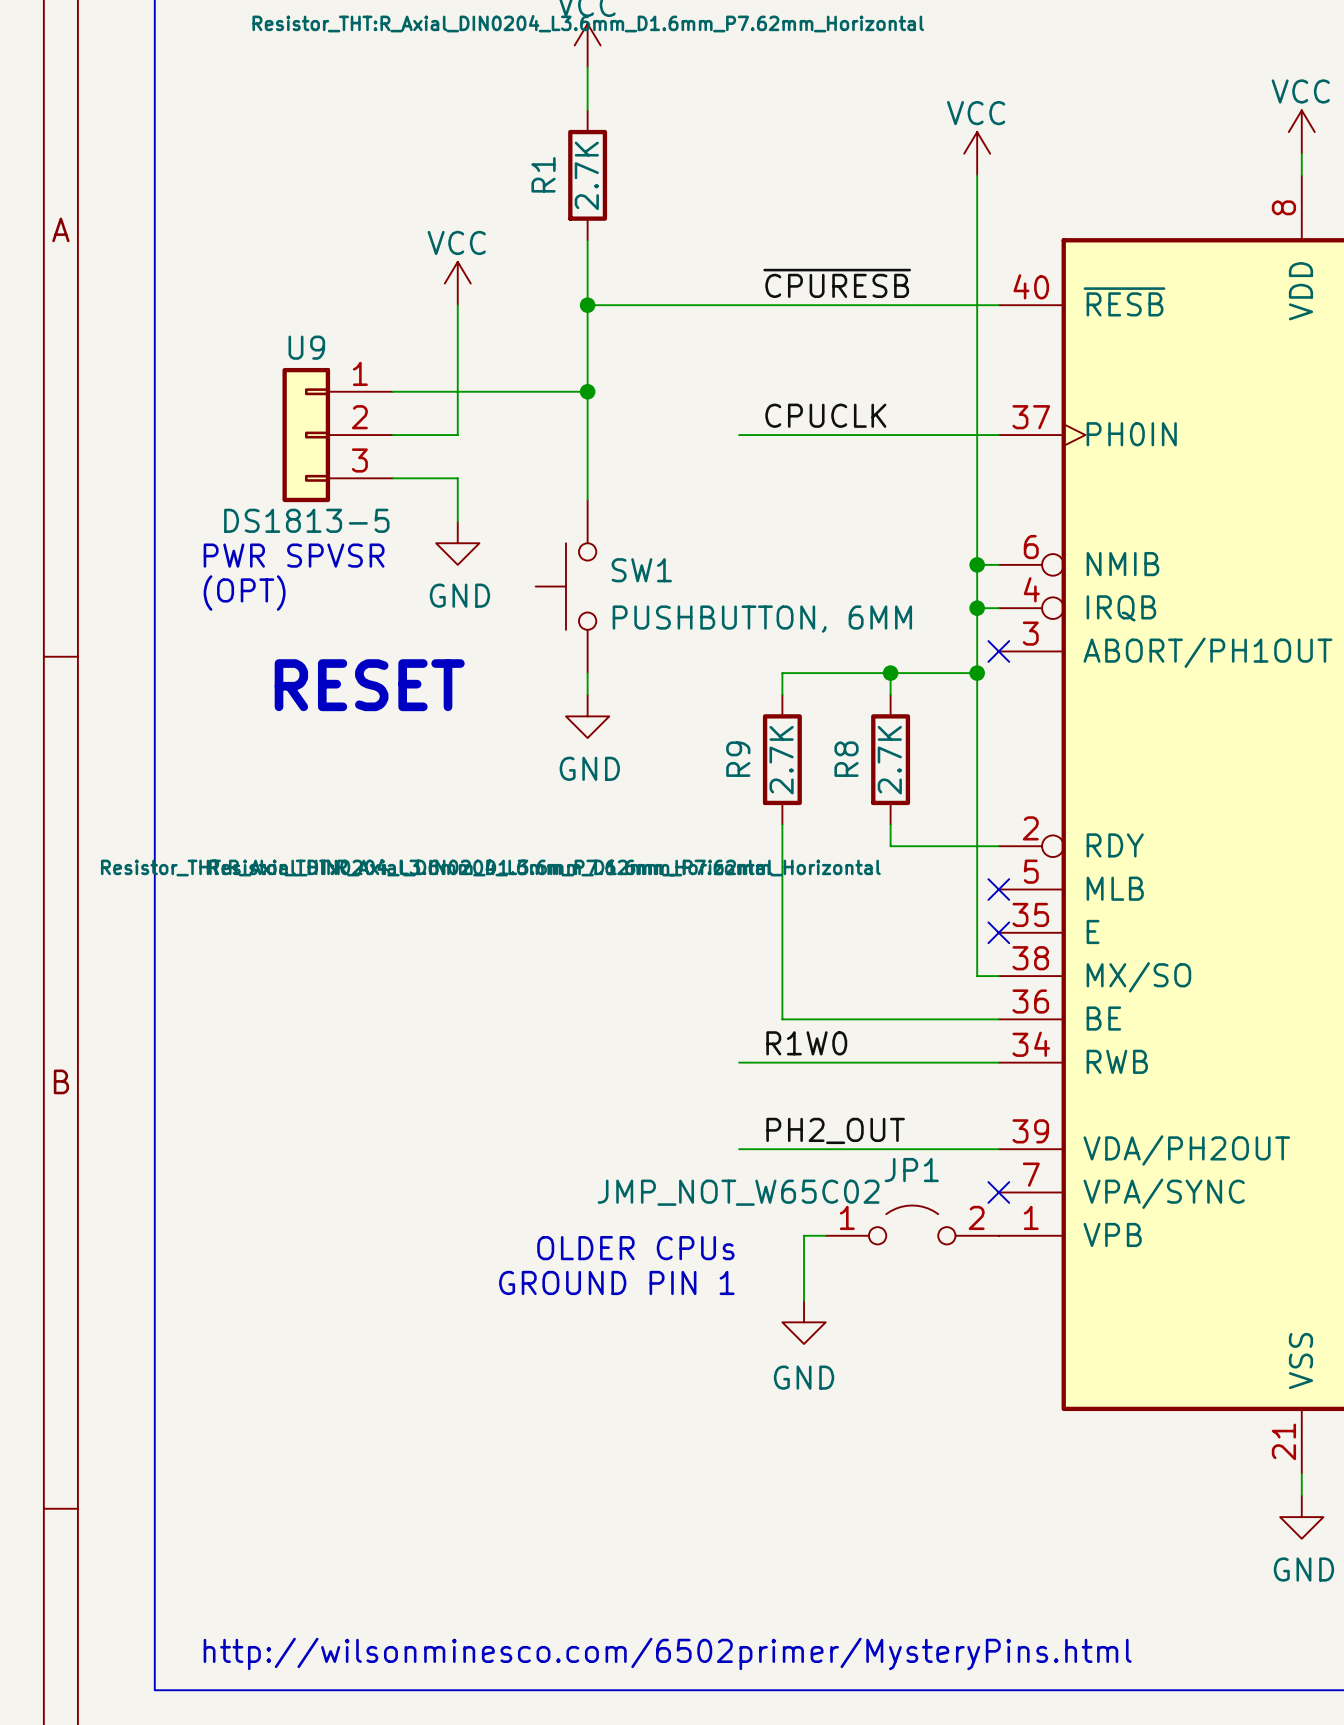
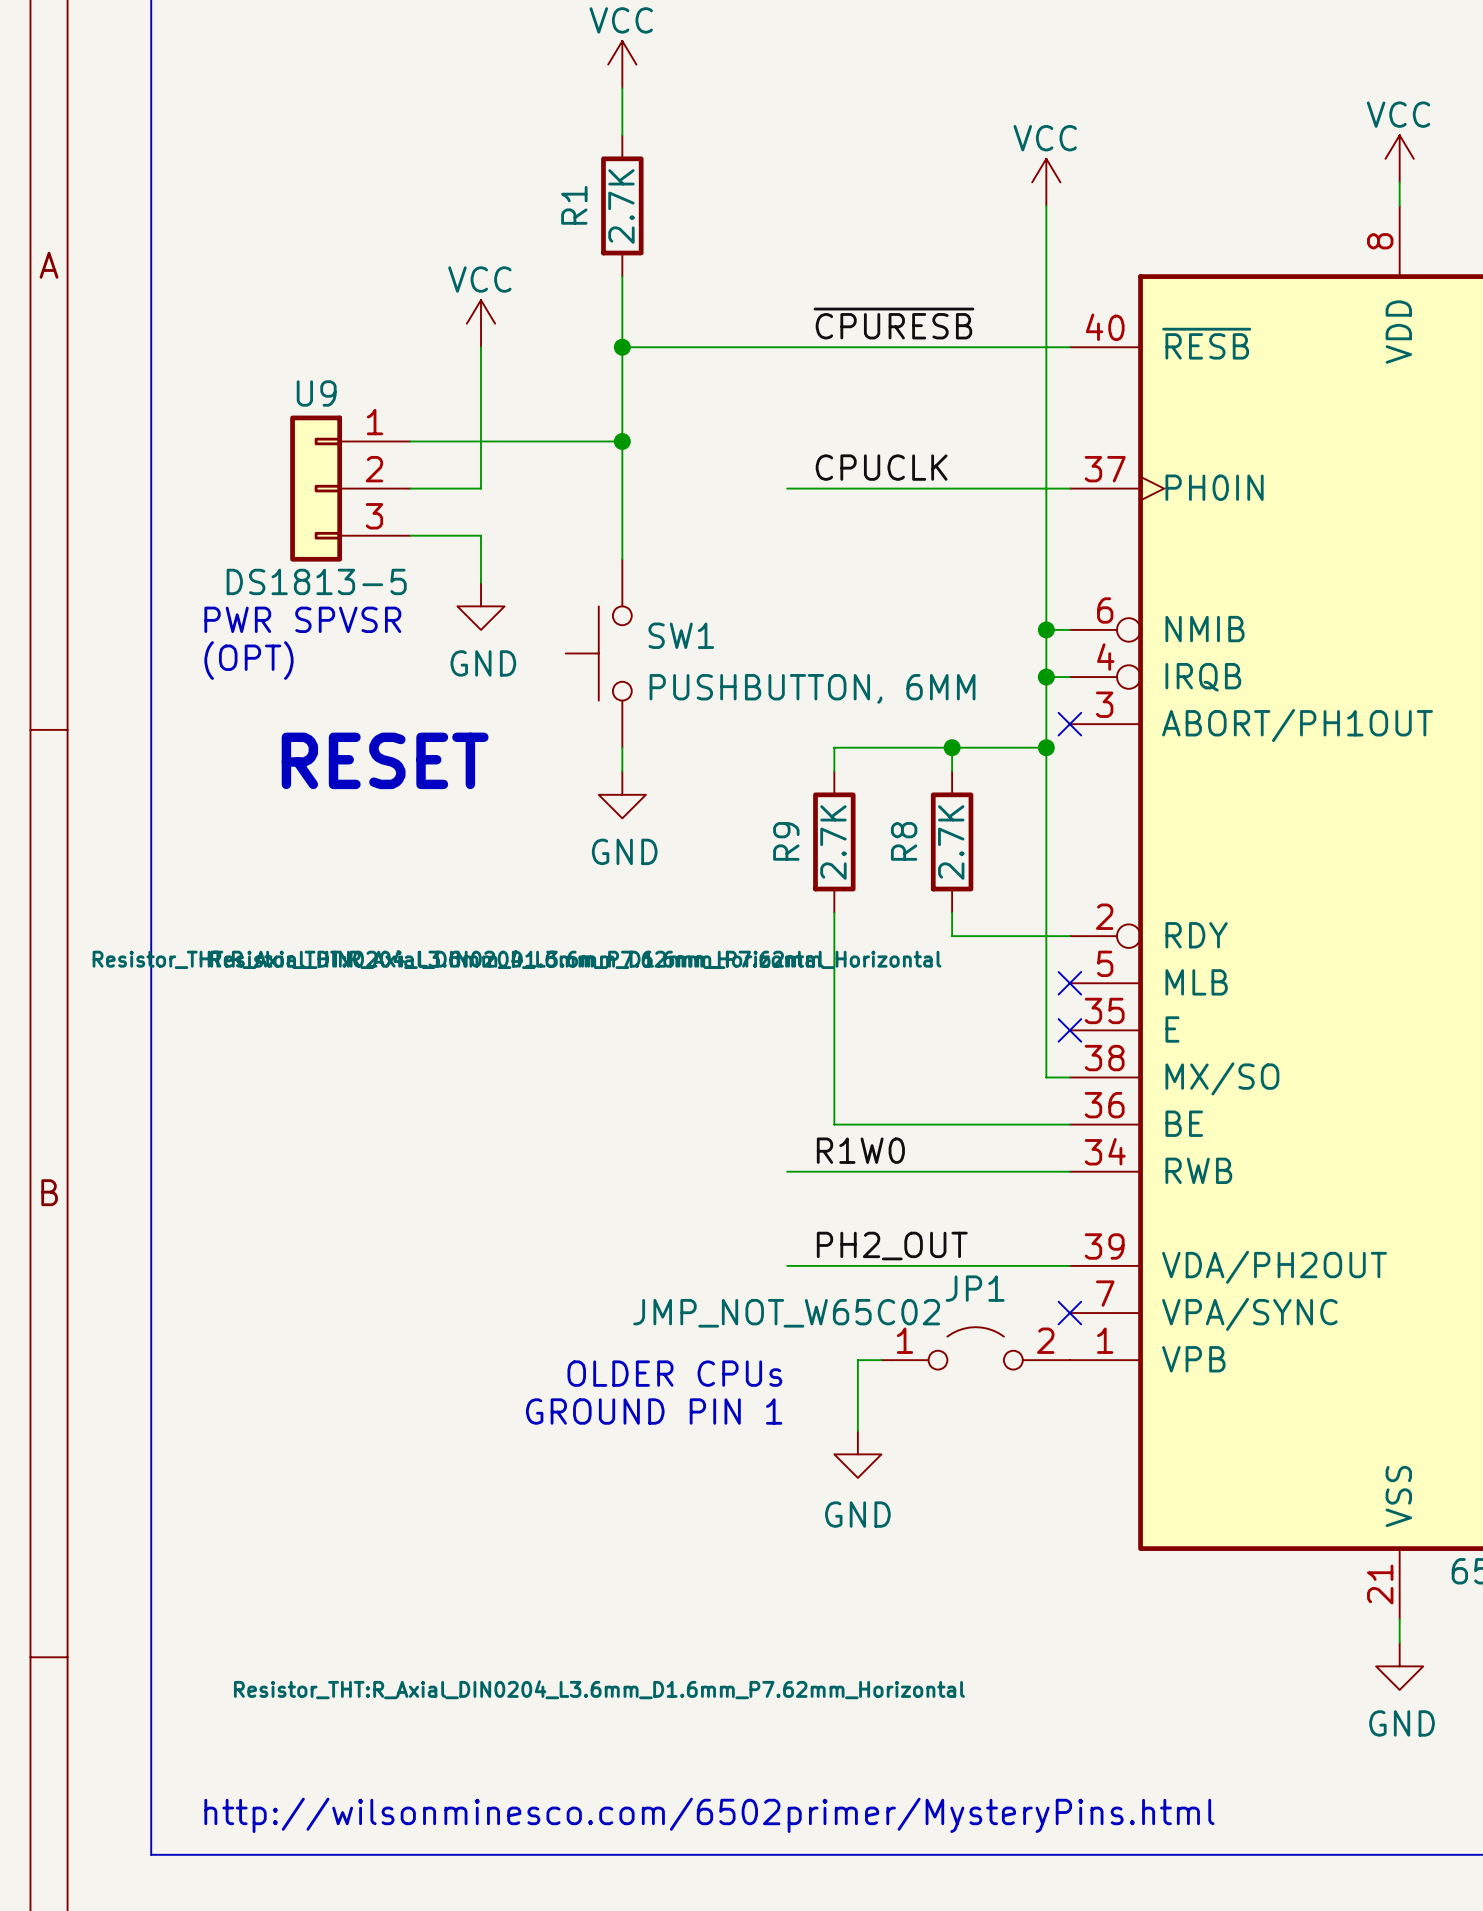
R1 text position: Resistor_THT:R_Axial_DIN0204_L3.6mm_D1.6mm_P7.62mm_Horizontal (588, 23) -> Resistor_THT:R_Axial_DIN0204_L3.6mm_D1.6mm_P7.62mm_Horizontal (599, 1689)

